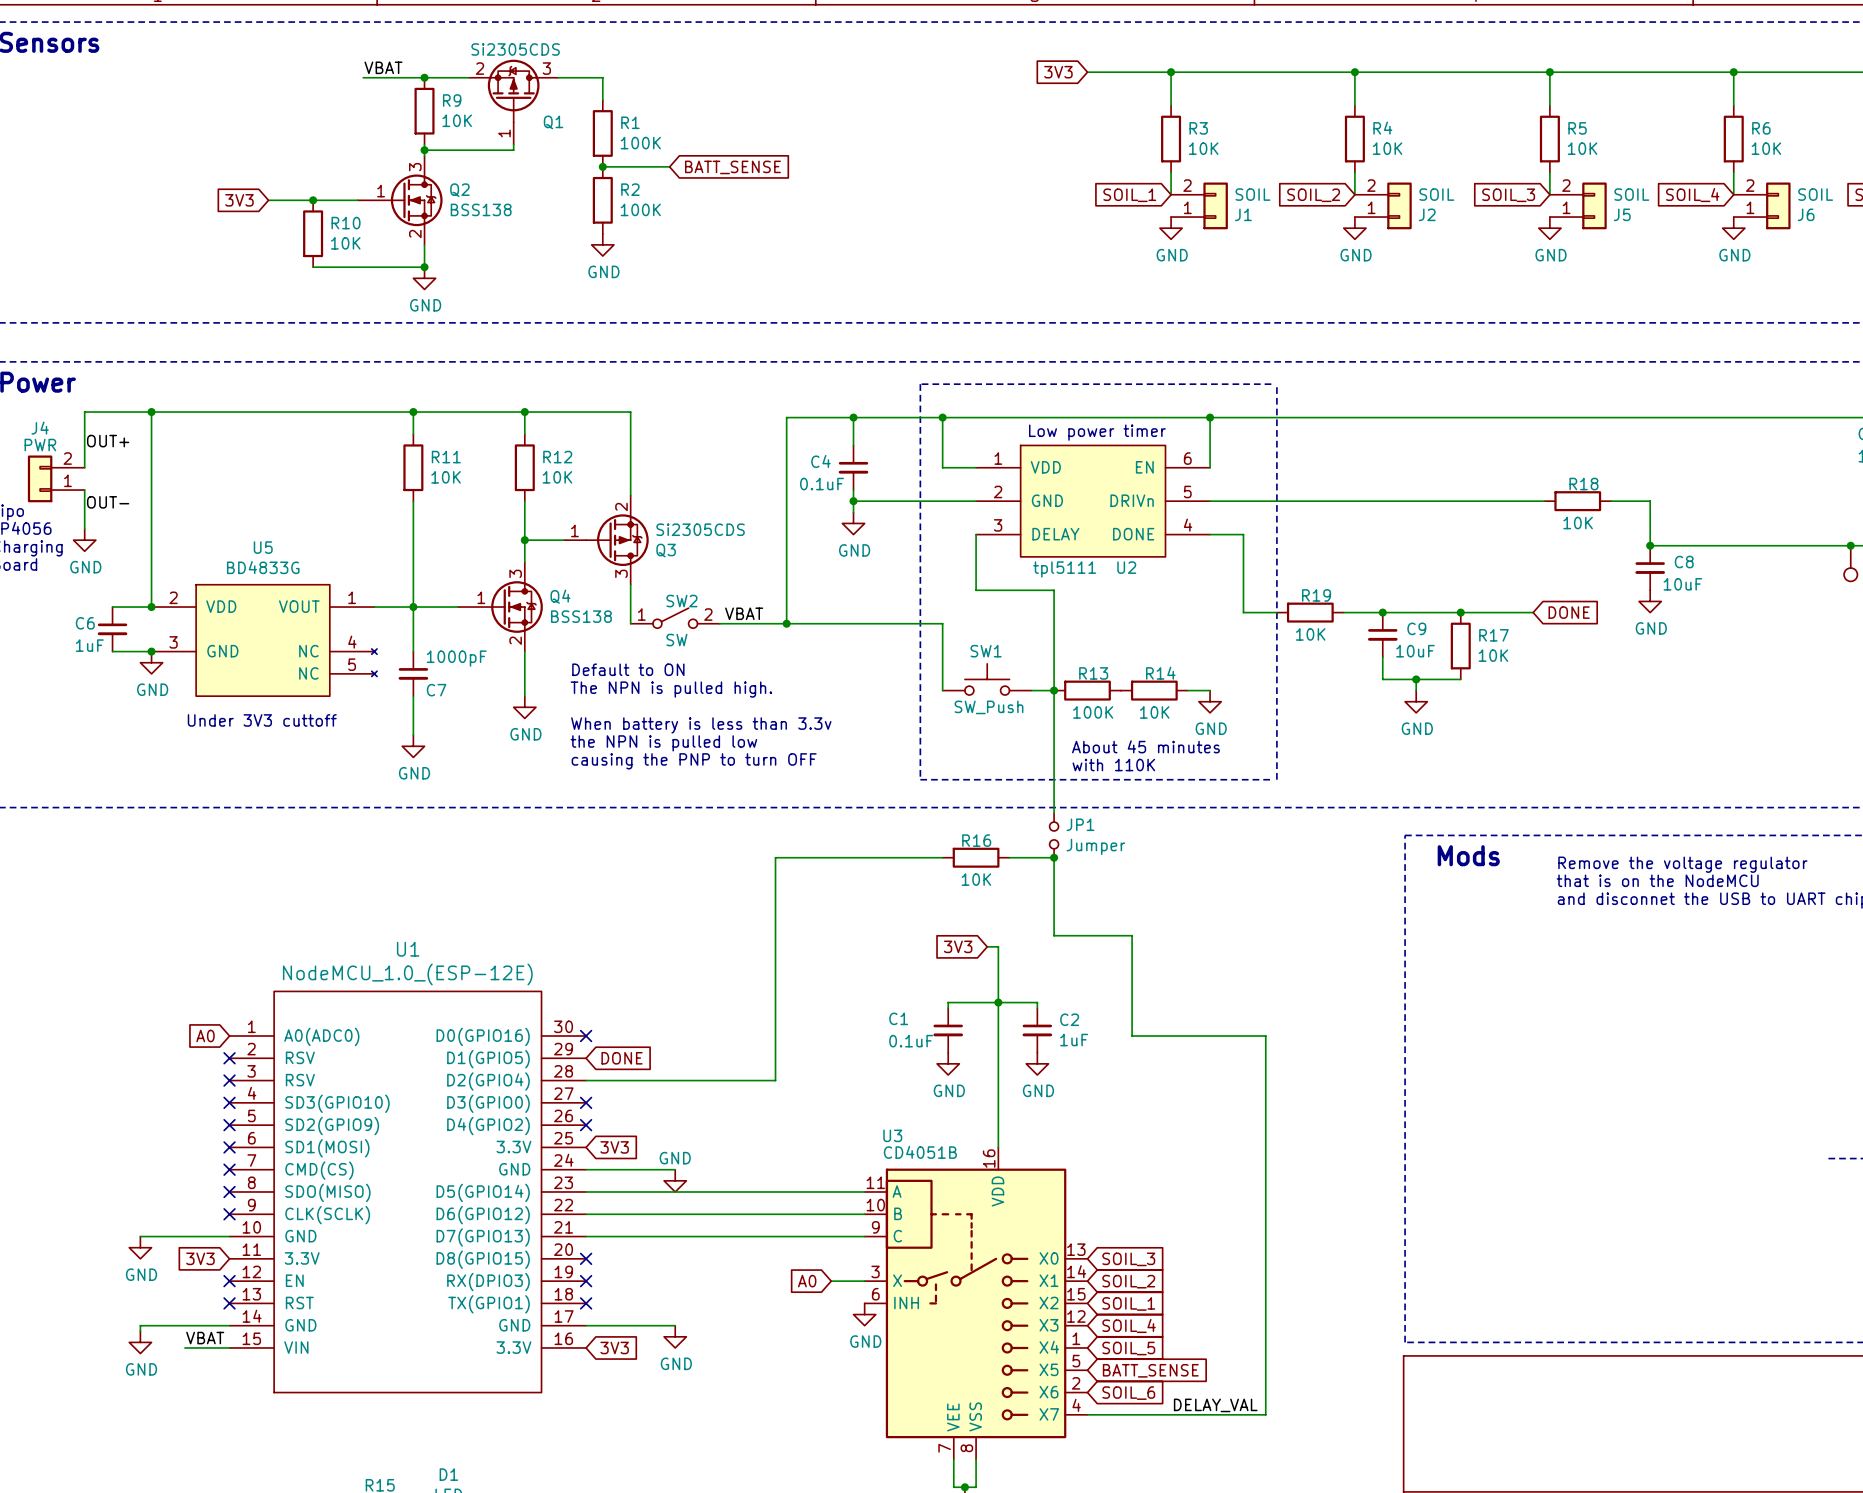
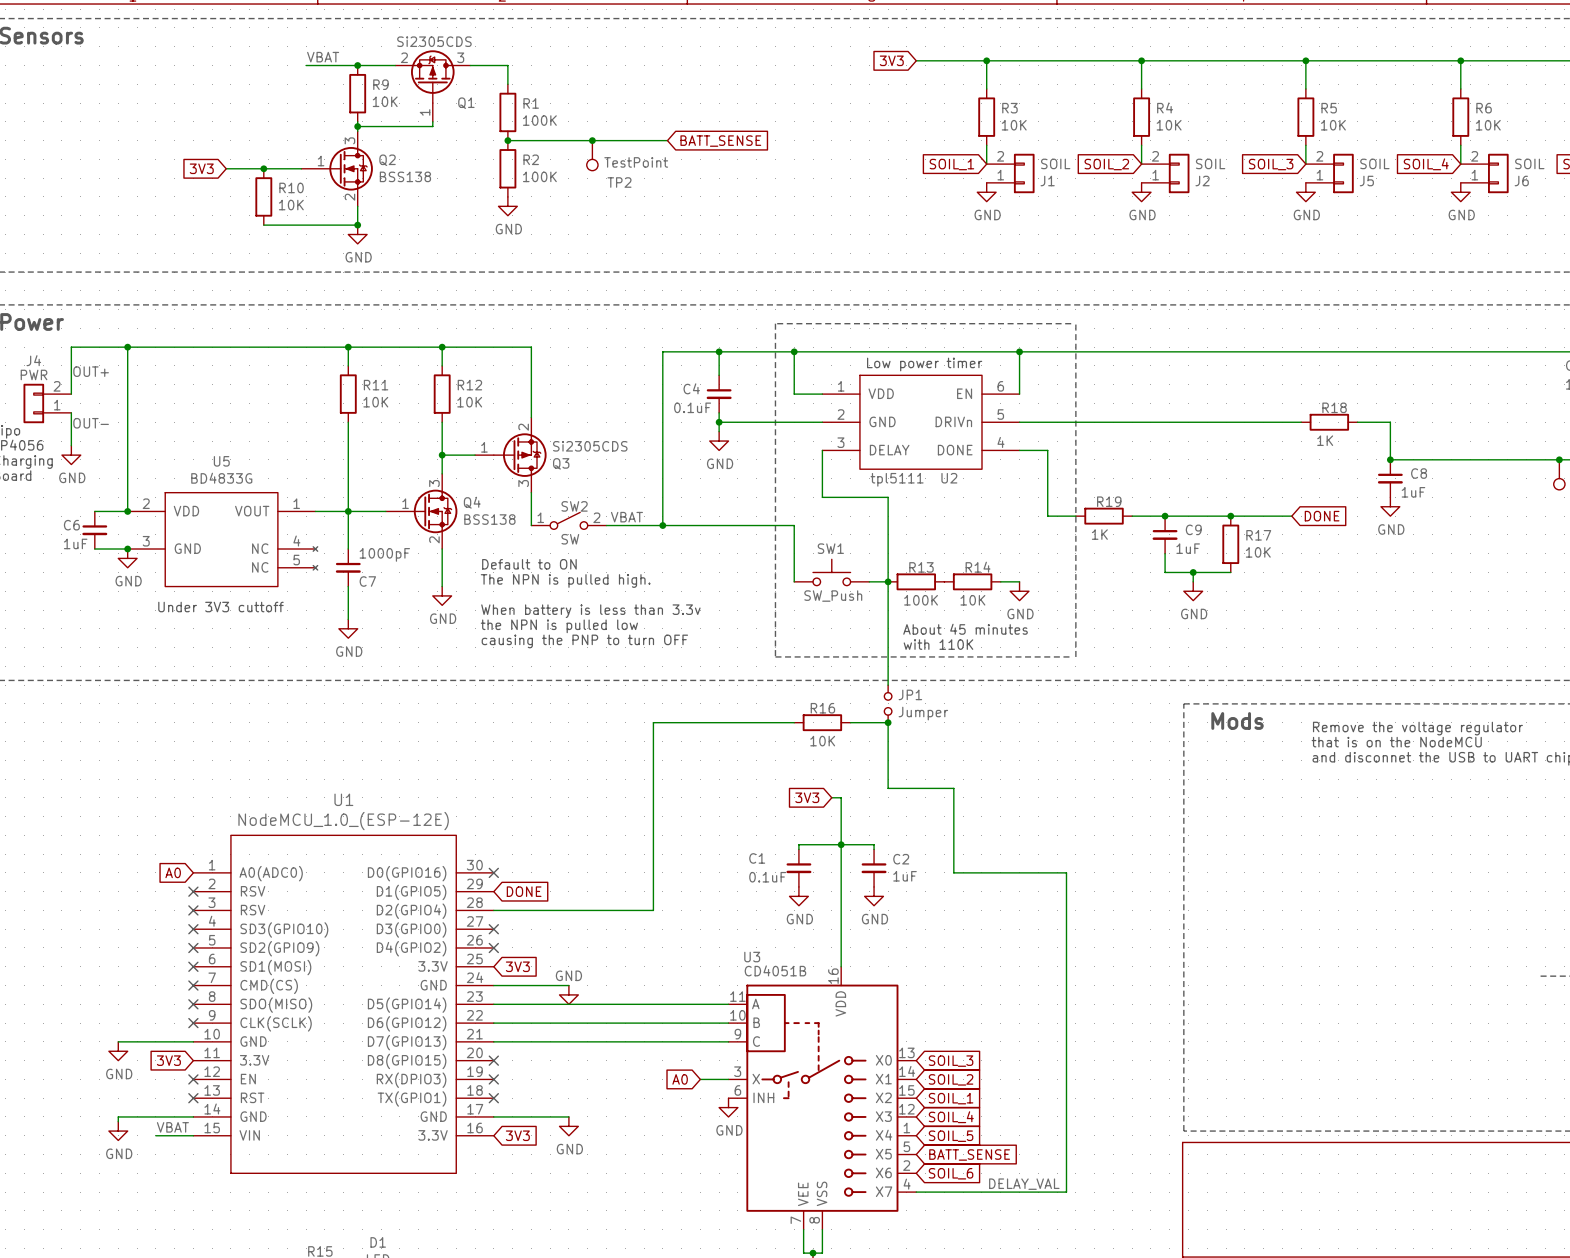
wire: none -> (564, 140) (667, 140)
junction: none -> (592, 140)
global label position: BATT_SENSE (732, 167) -> BATT_SENSE (720, 141)
TP2: none -> TestPoint (592, 155)
R18 value: 10K (1578, 523) -> 1K (1325, 440)
C8 value: 10uF (1682, 584) -> 1uF (1413, 492)
R19 value: 10K (1310, 634) -> 1K (1099, 534)
C9 value: 10uF (1415, 651) -> 1uF (1188, 548)

